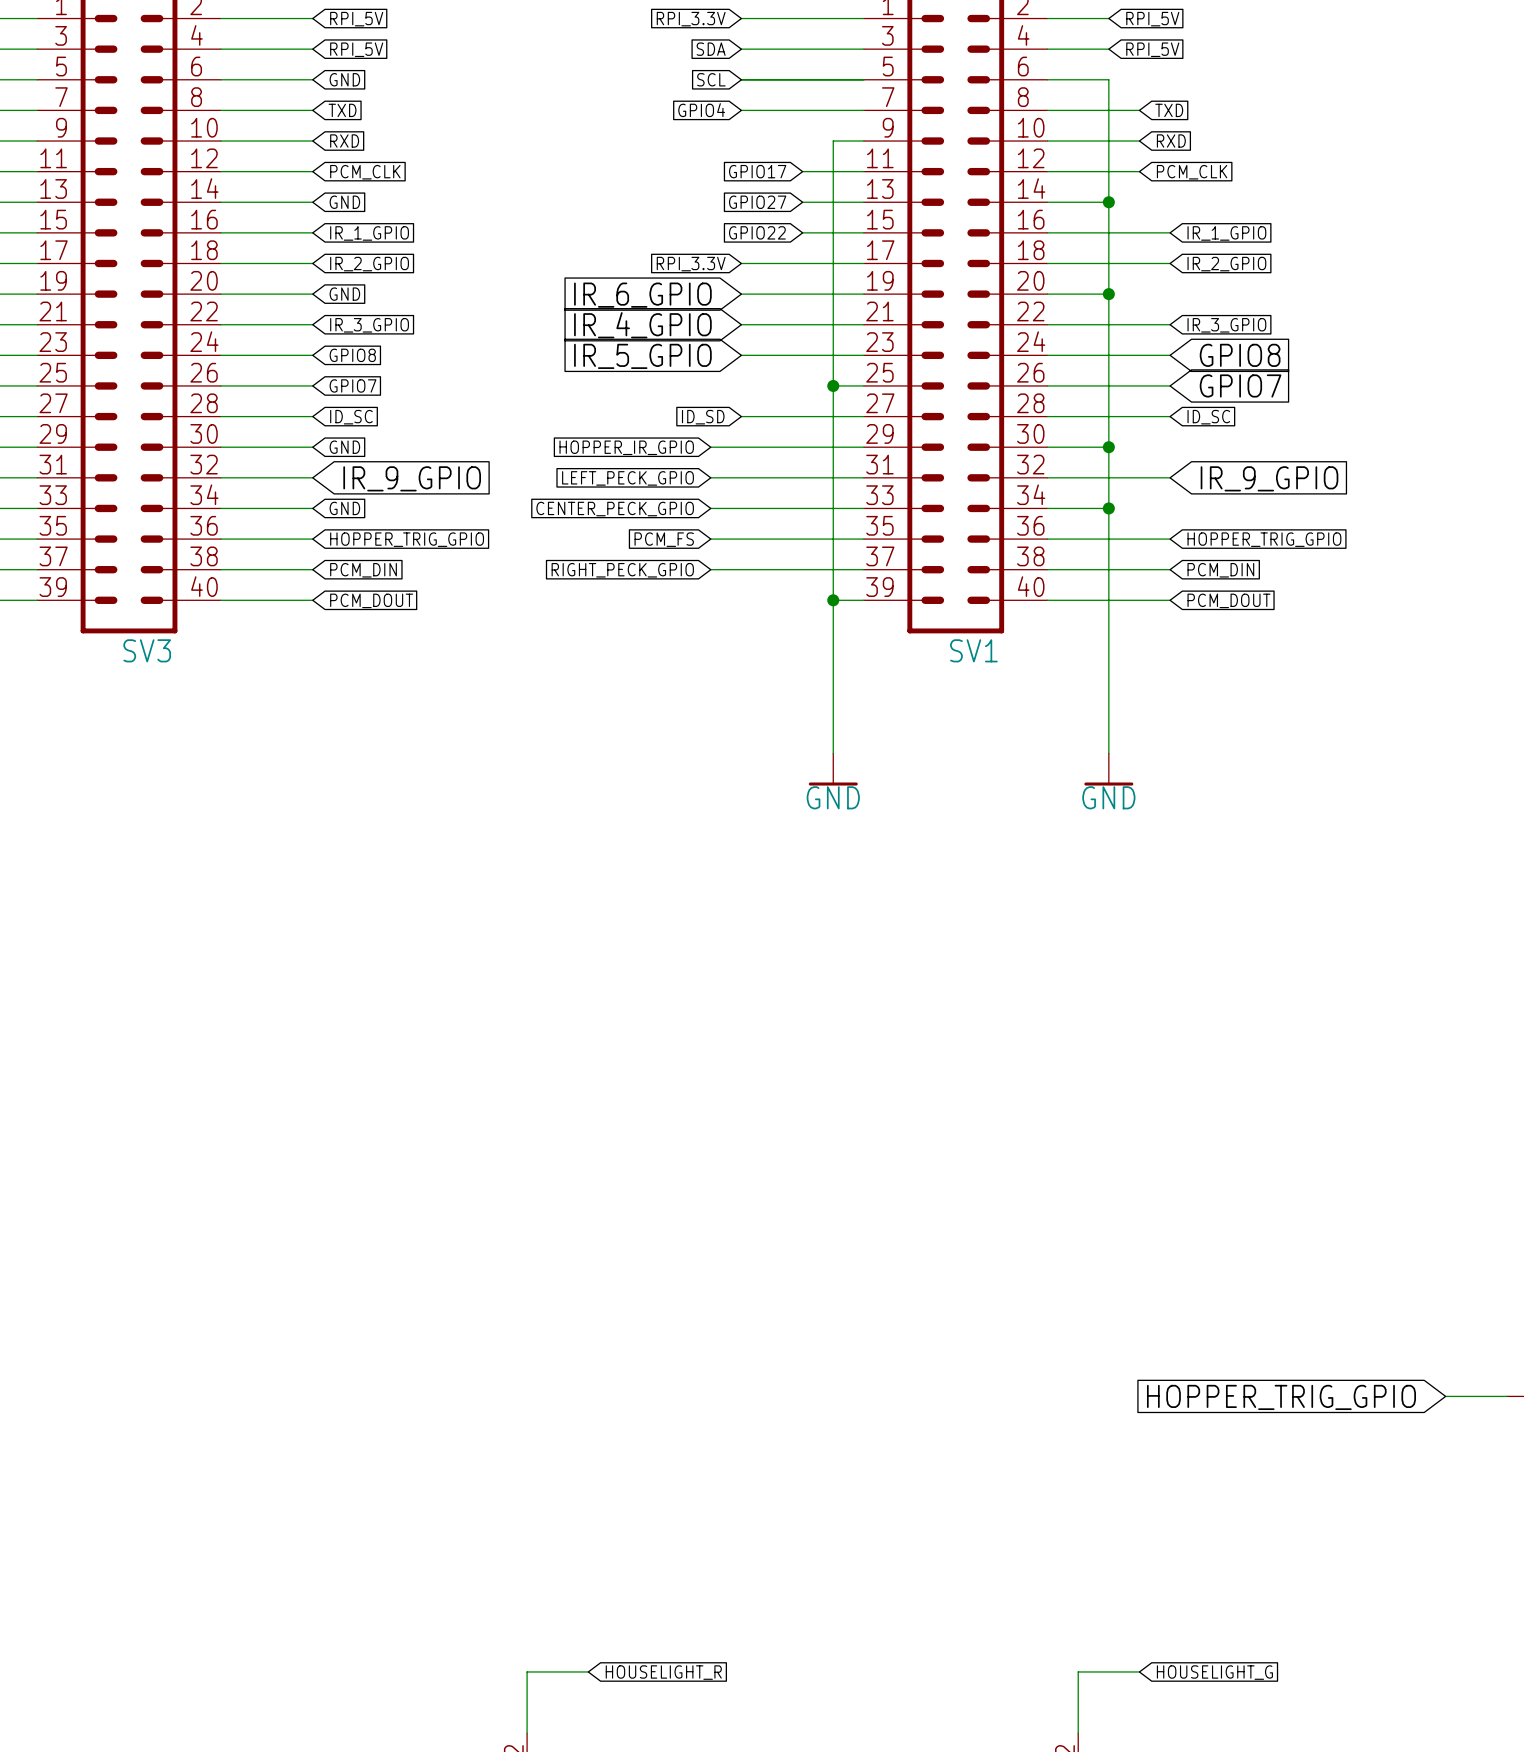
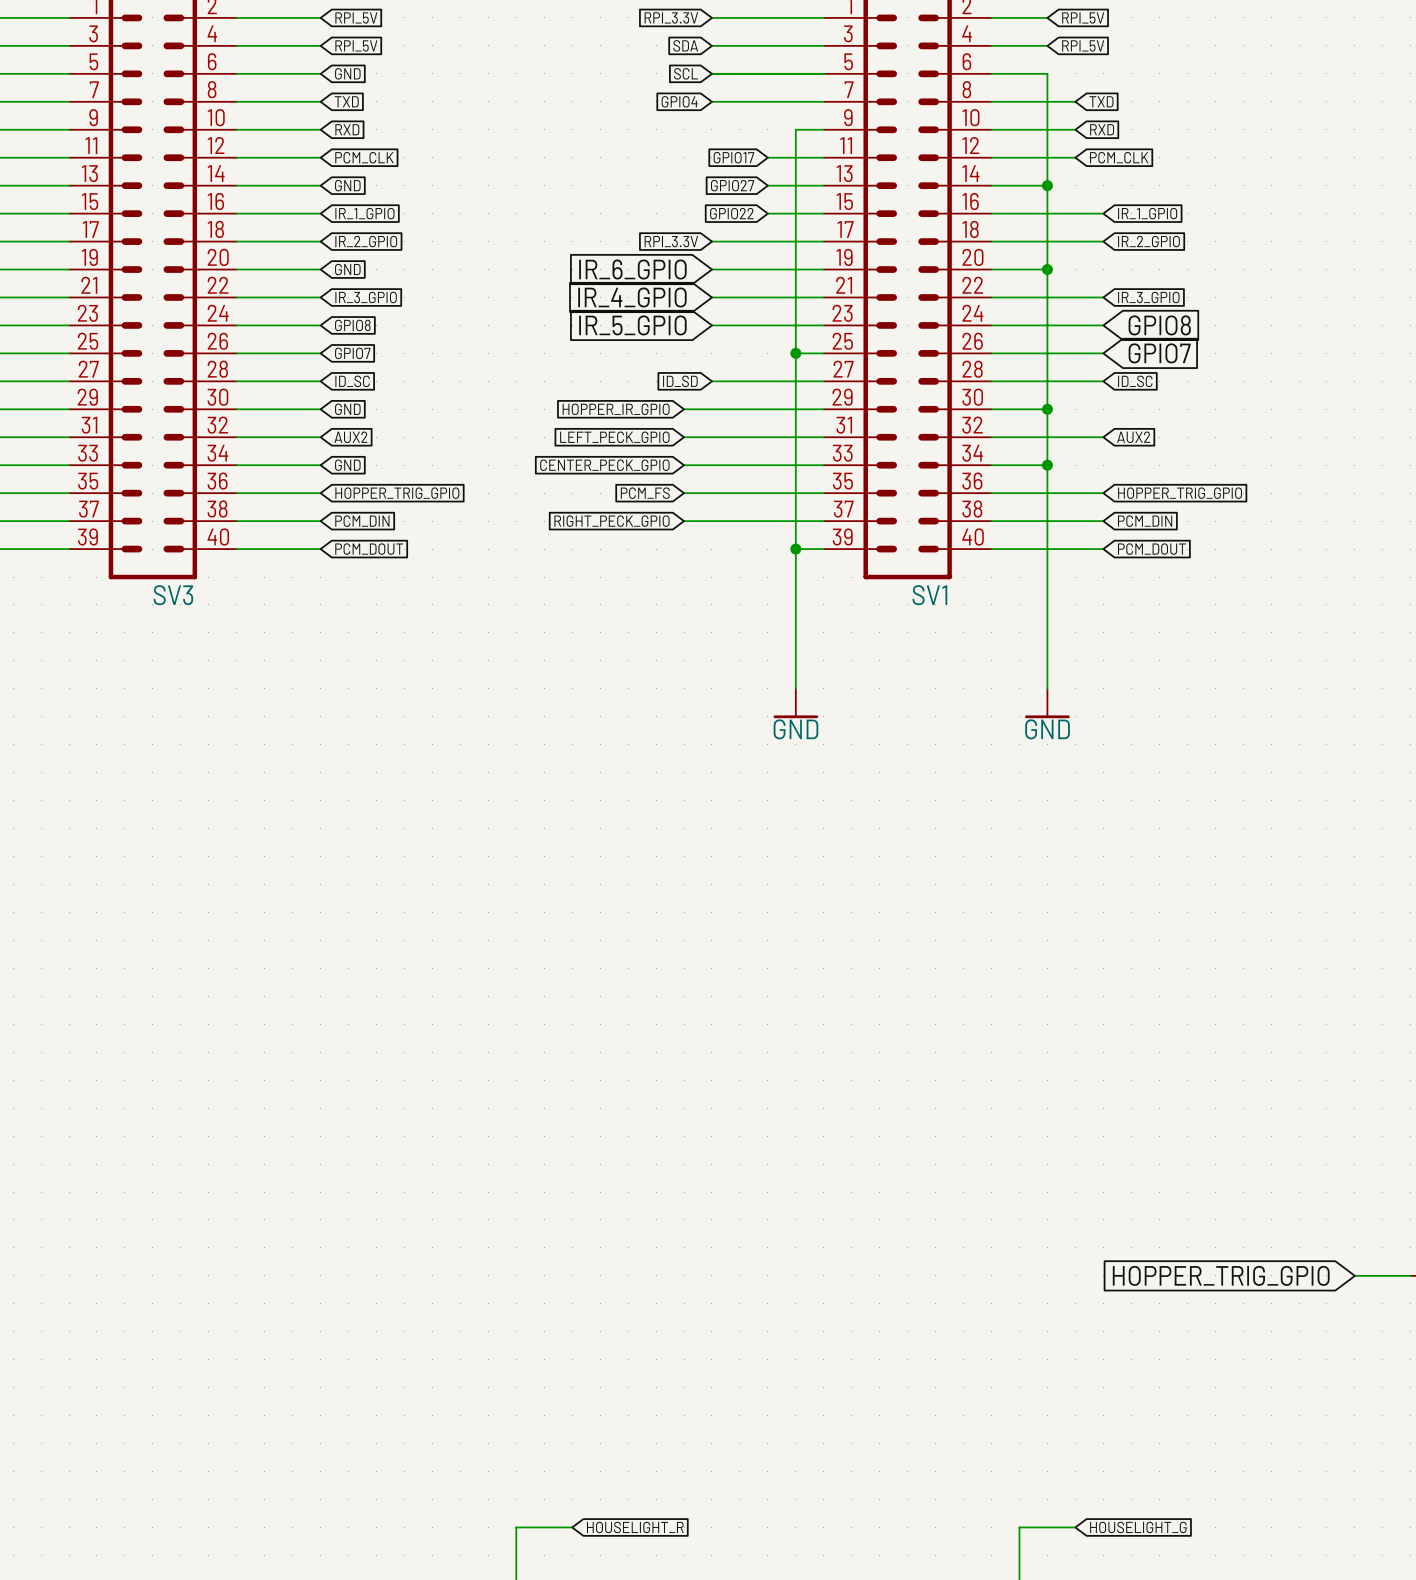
global label: IR_9_GPIO (412, 478) -> AUX2 (350, 437)
global label: IR_9_GPIO (1269, 478) -> AUX2 (1133, 437)

